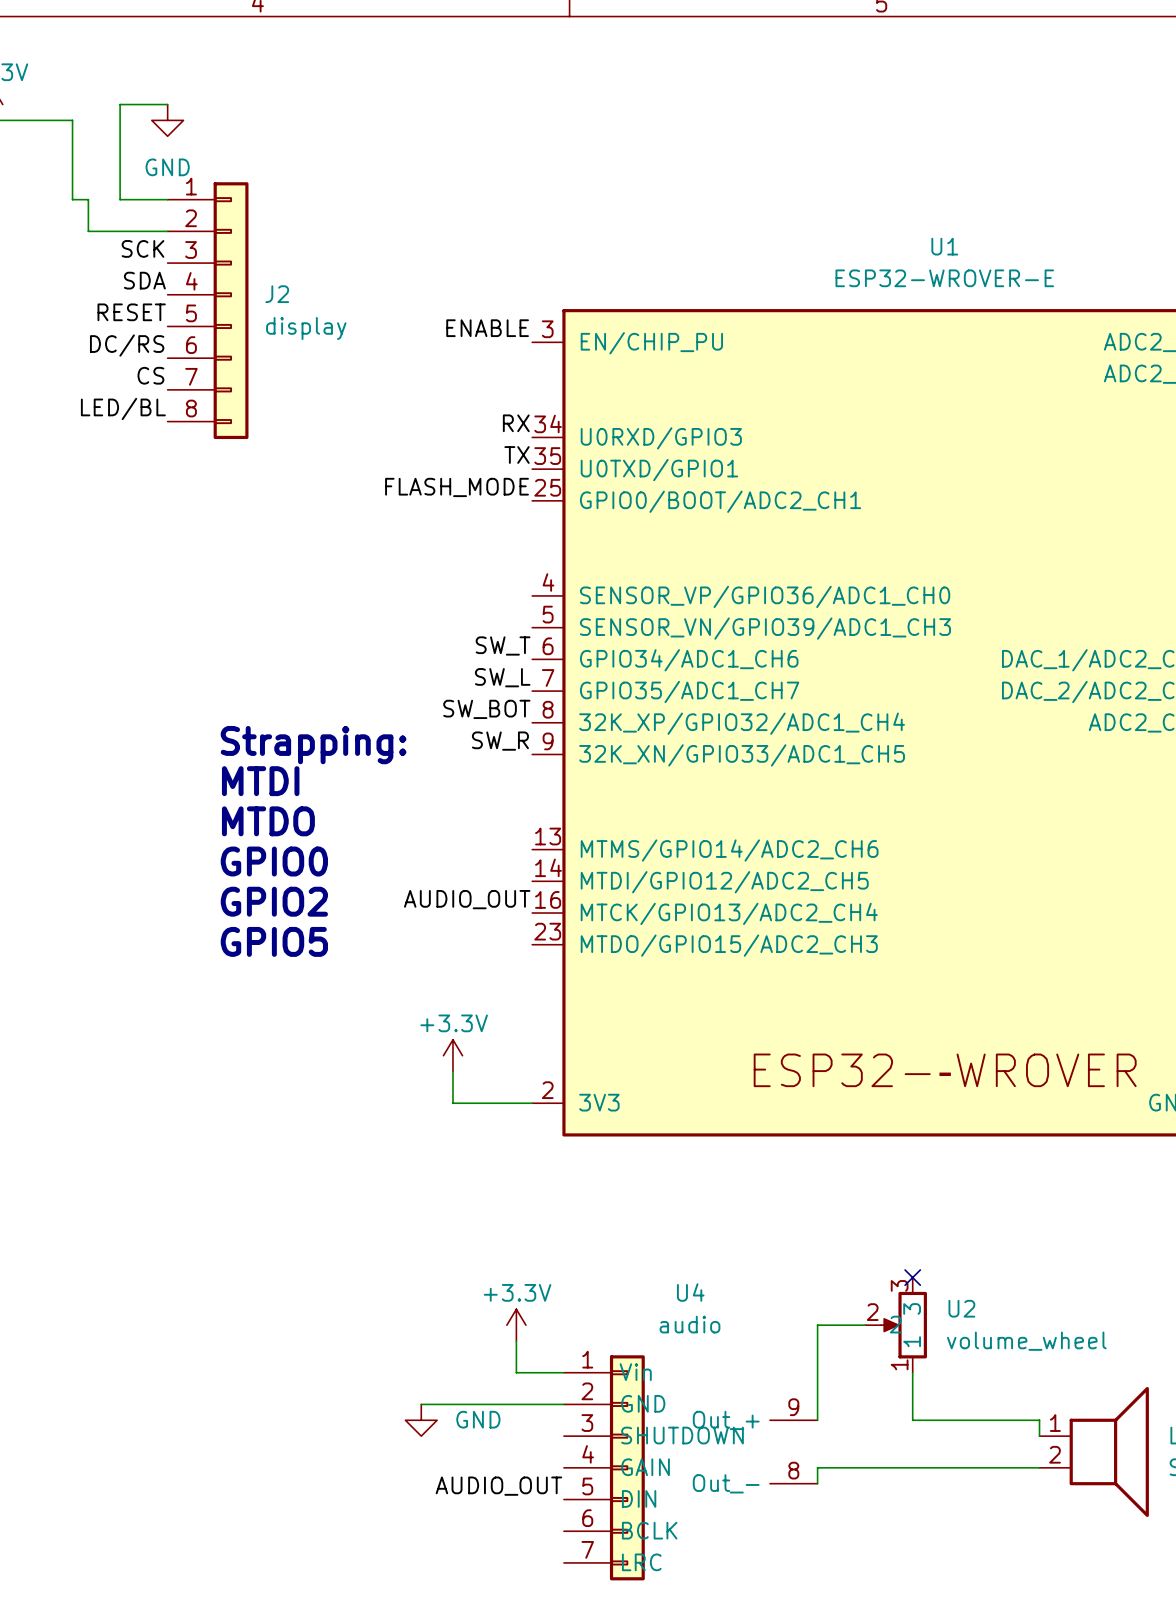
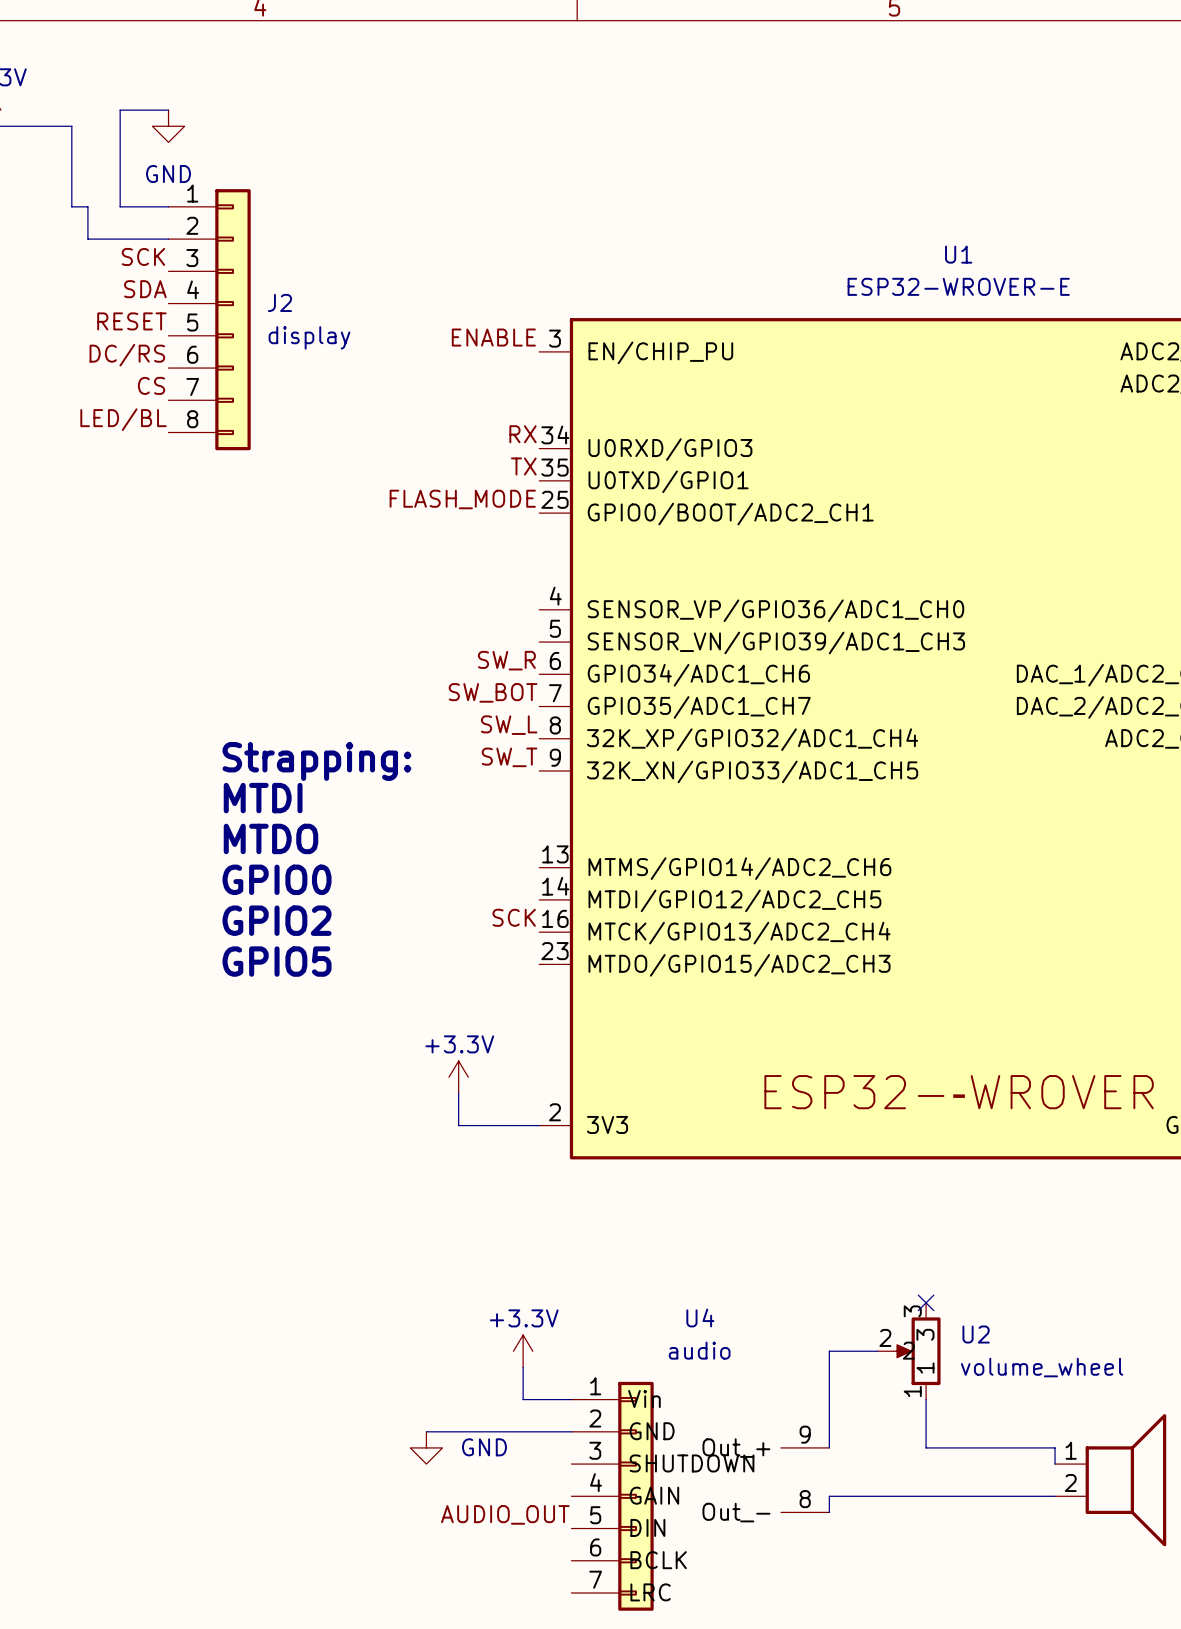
label: SW_T (503, 645) -> SW_R (506, 660)
label: SW_L (502, 677) -> SW_BOT (493, 692)
label: SW_BOT (486, 709) -> SW_L (509, 725)
label: SW_R (500, 741) -> SW_T (509, 757)
label: AUDIO_OUT (467, 899) -> SCK (514, 917)

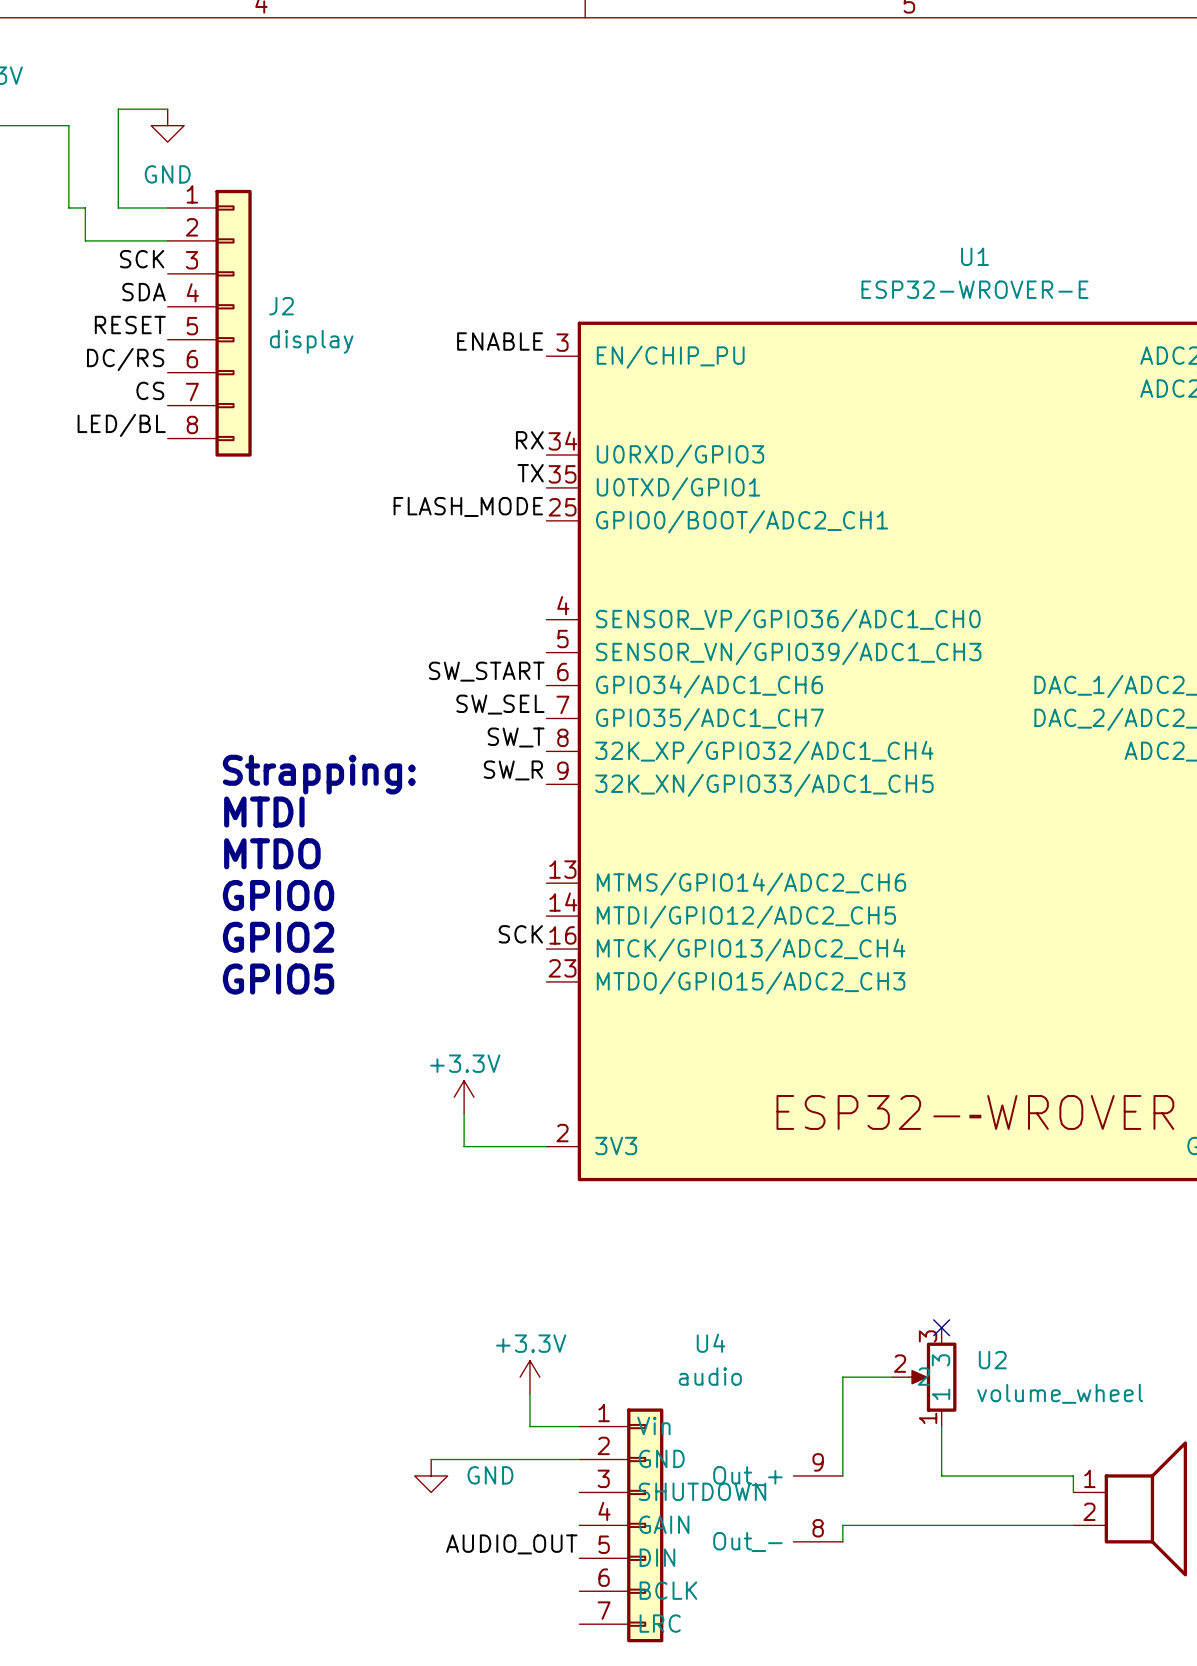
label: SW_R (506, 660) -> SW_START (486, 671)
label: SW_BOT (493, 692) -> SW_SEL (500, 704)
label: SW_L (509, 725) -> SW_T (516, 737)
label: SW_T (509, 757) -> SW_R (513, 770)

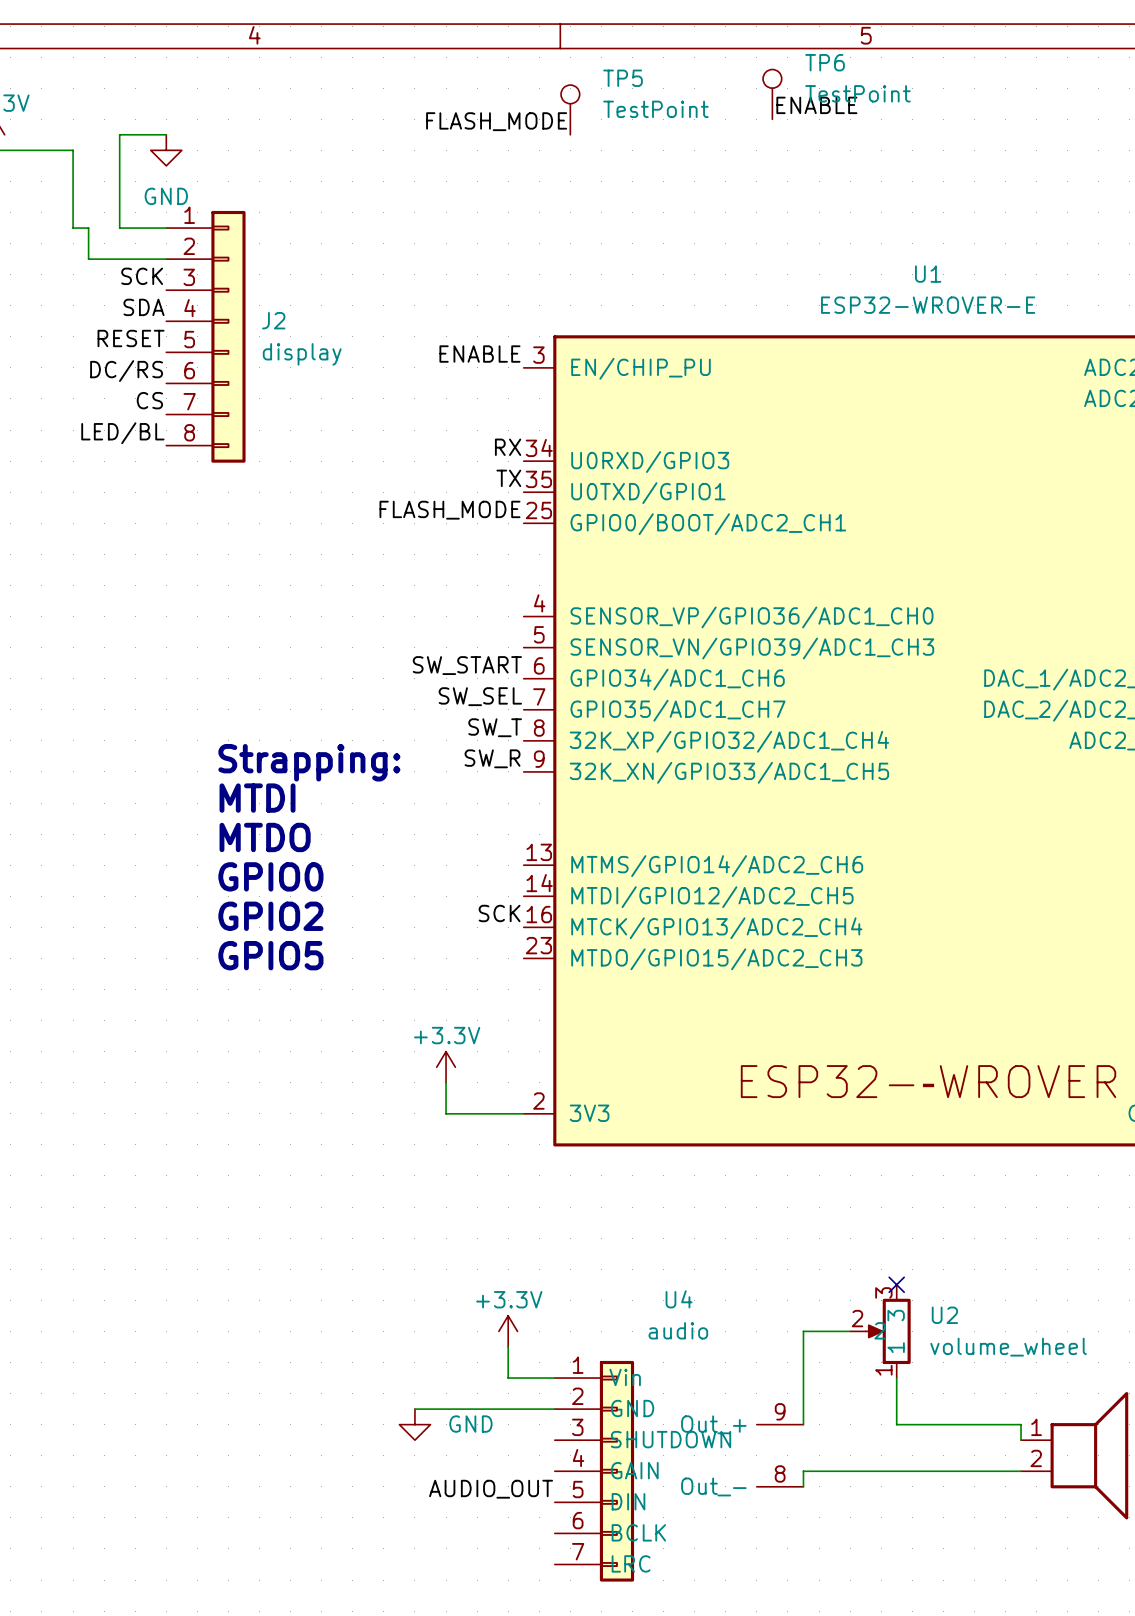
TP6: none -> TestPoint (772, 94)
label: none -> ENABLE (816, 105)
TP5: none -> TestPoint (570, 109)
label: none -> FLASH_MODE (496, 121)

